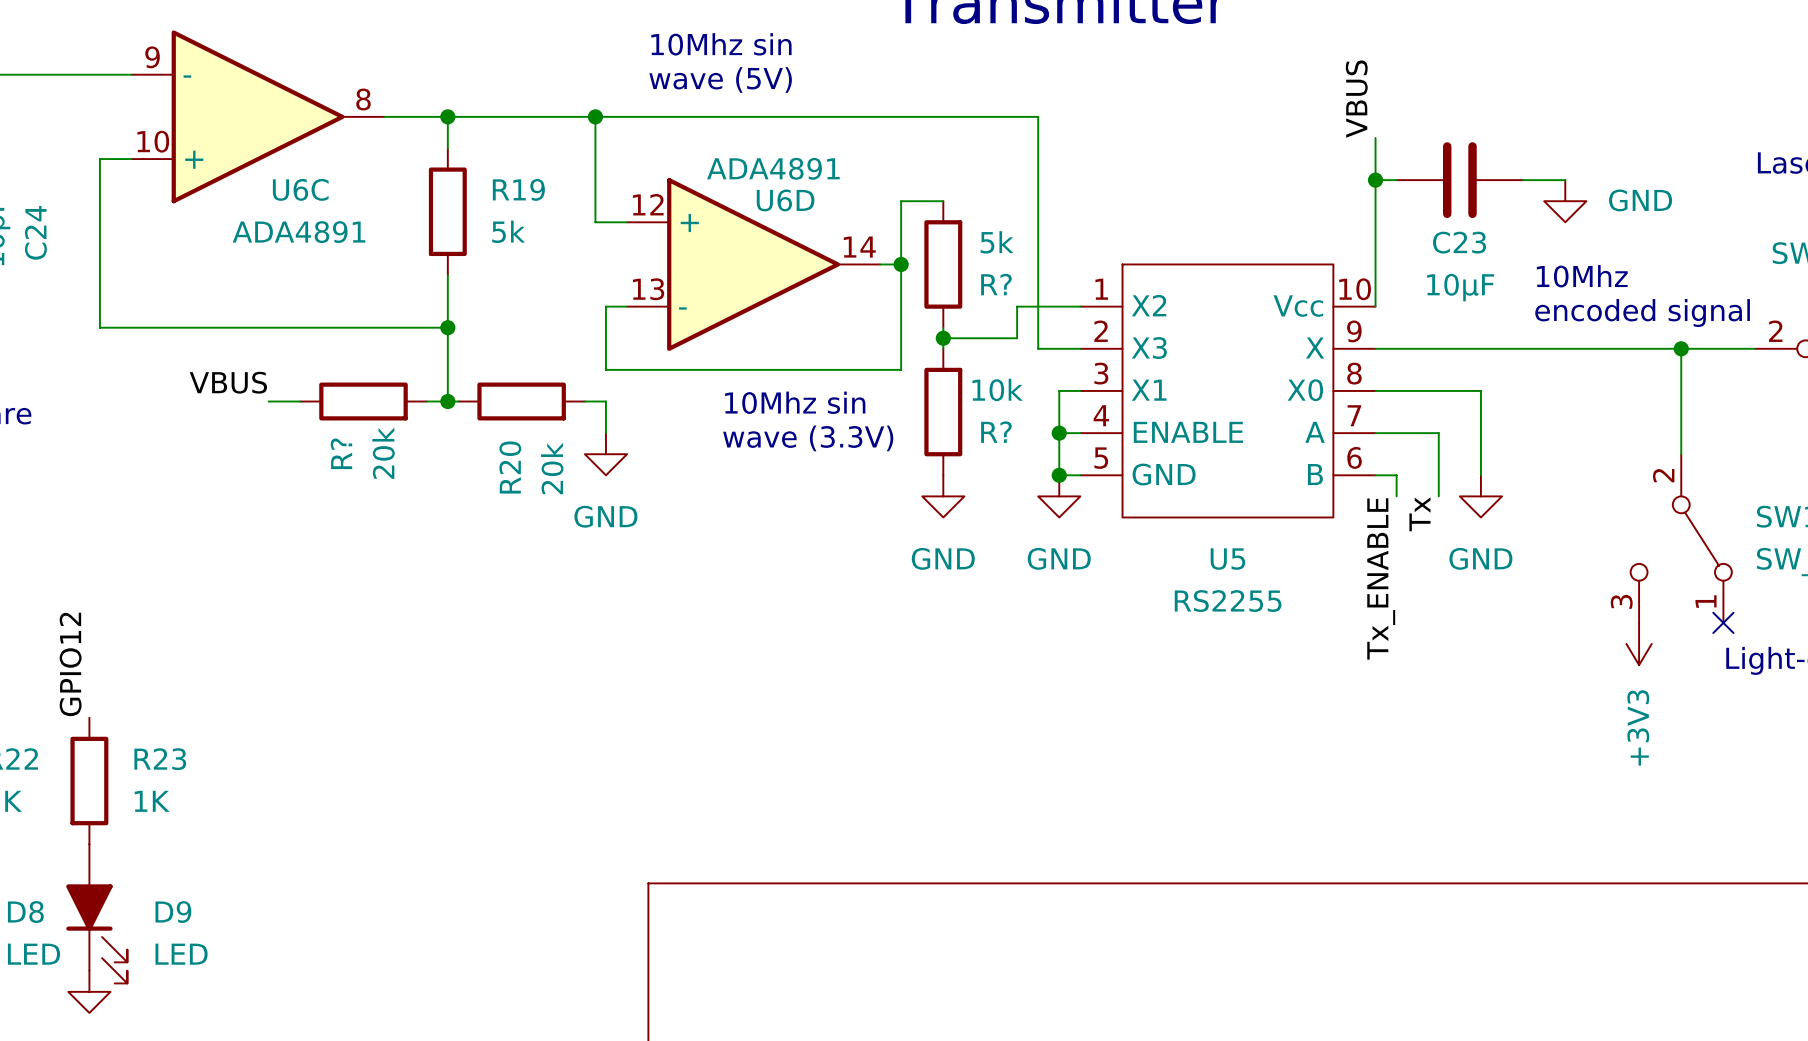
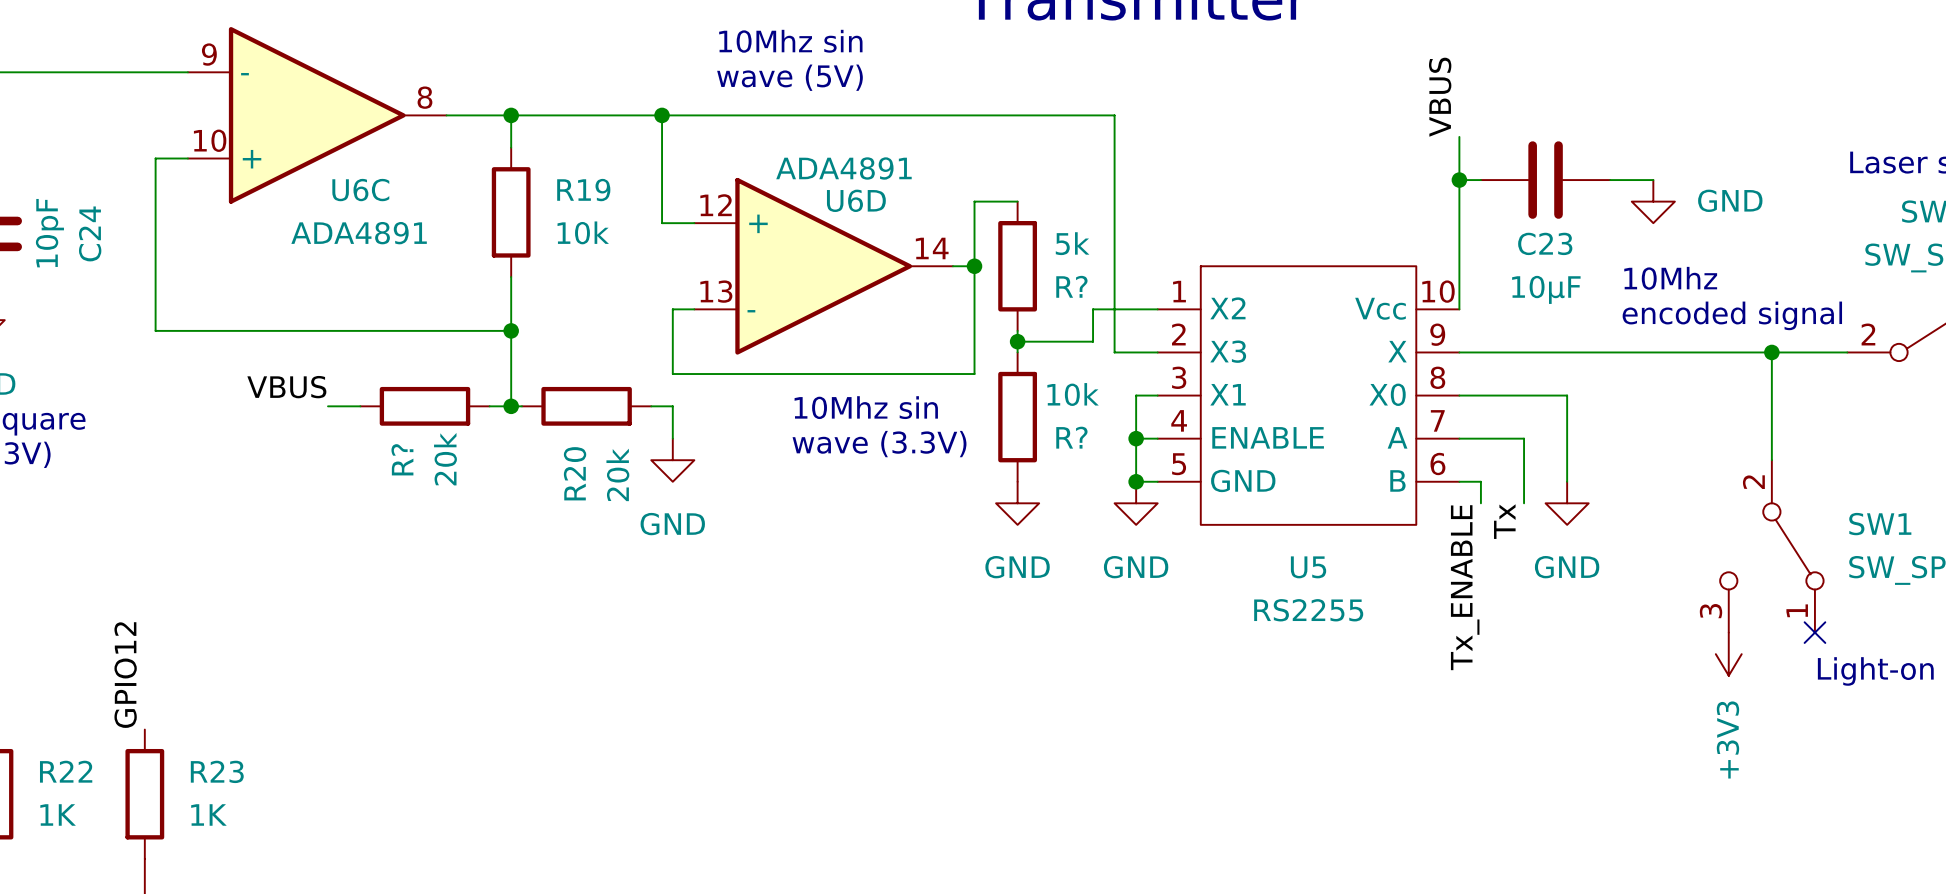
R19 value: 5k (508, 231) -> 10k (583, 232)

